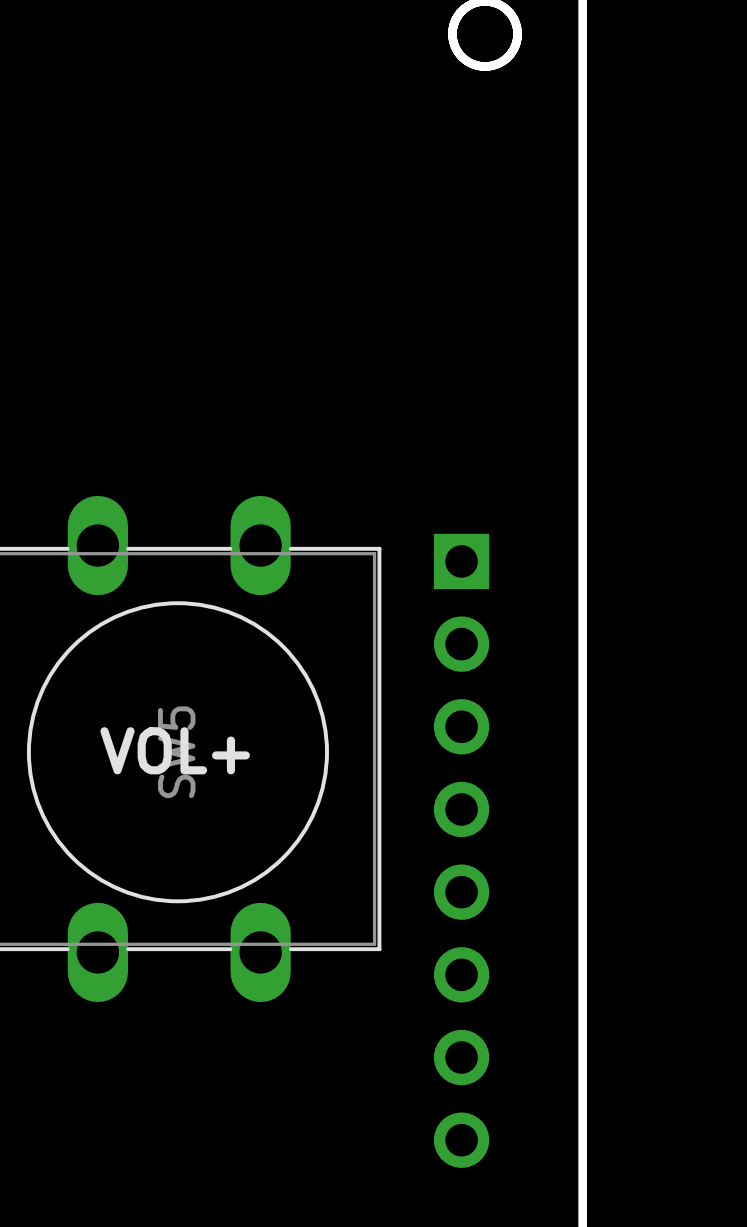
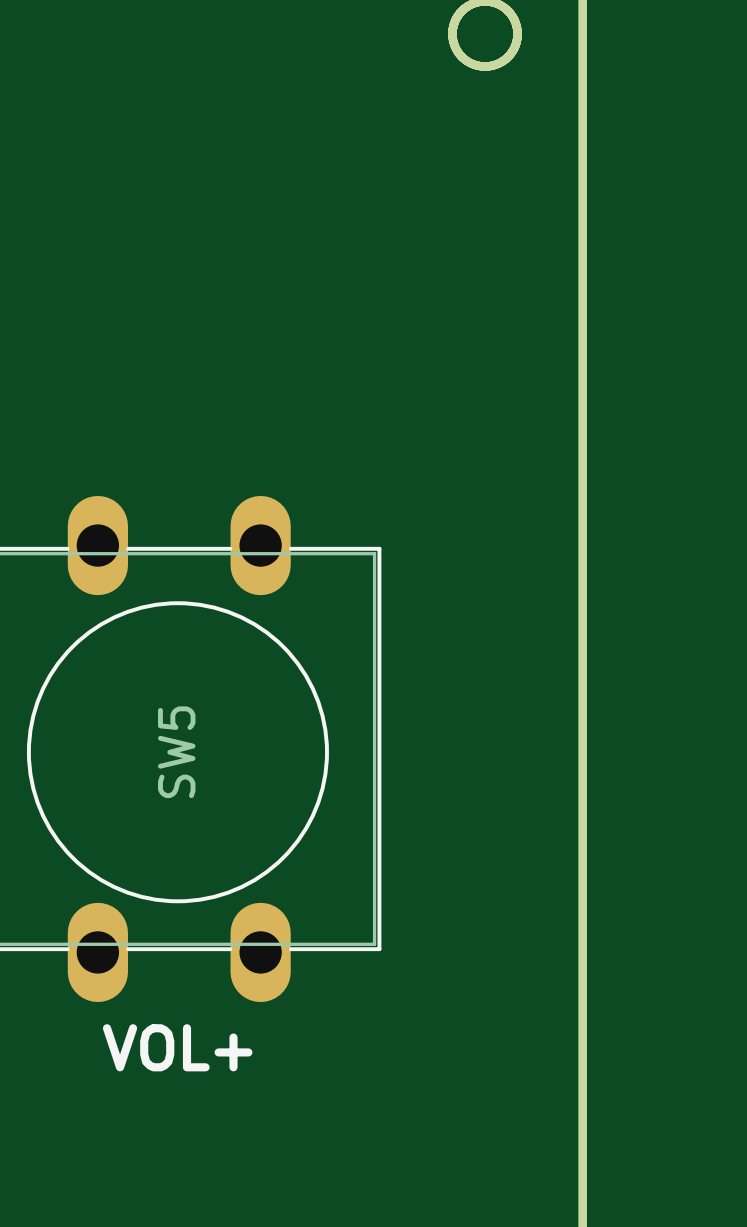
text position: VOL+ (175, 750) -> VOL+ (177, 1047)
part: (461, 850) -> none

